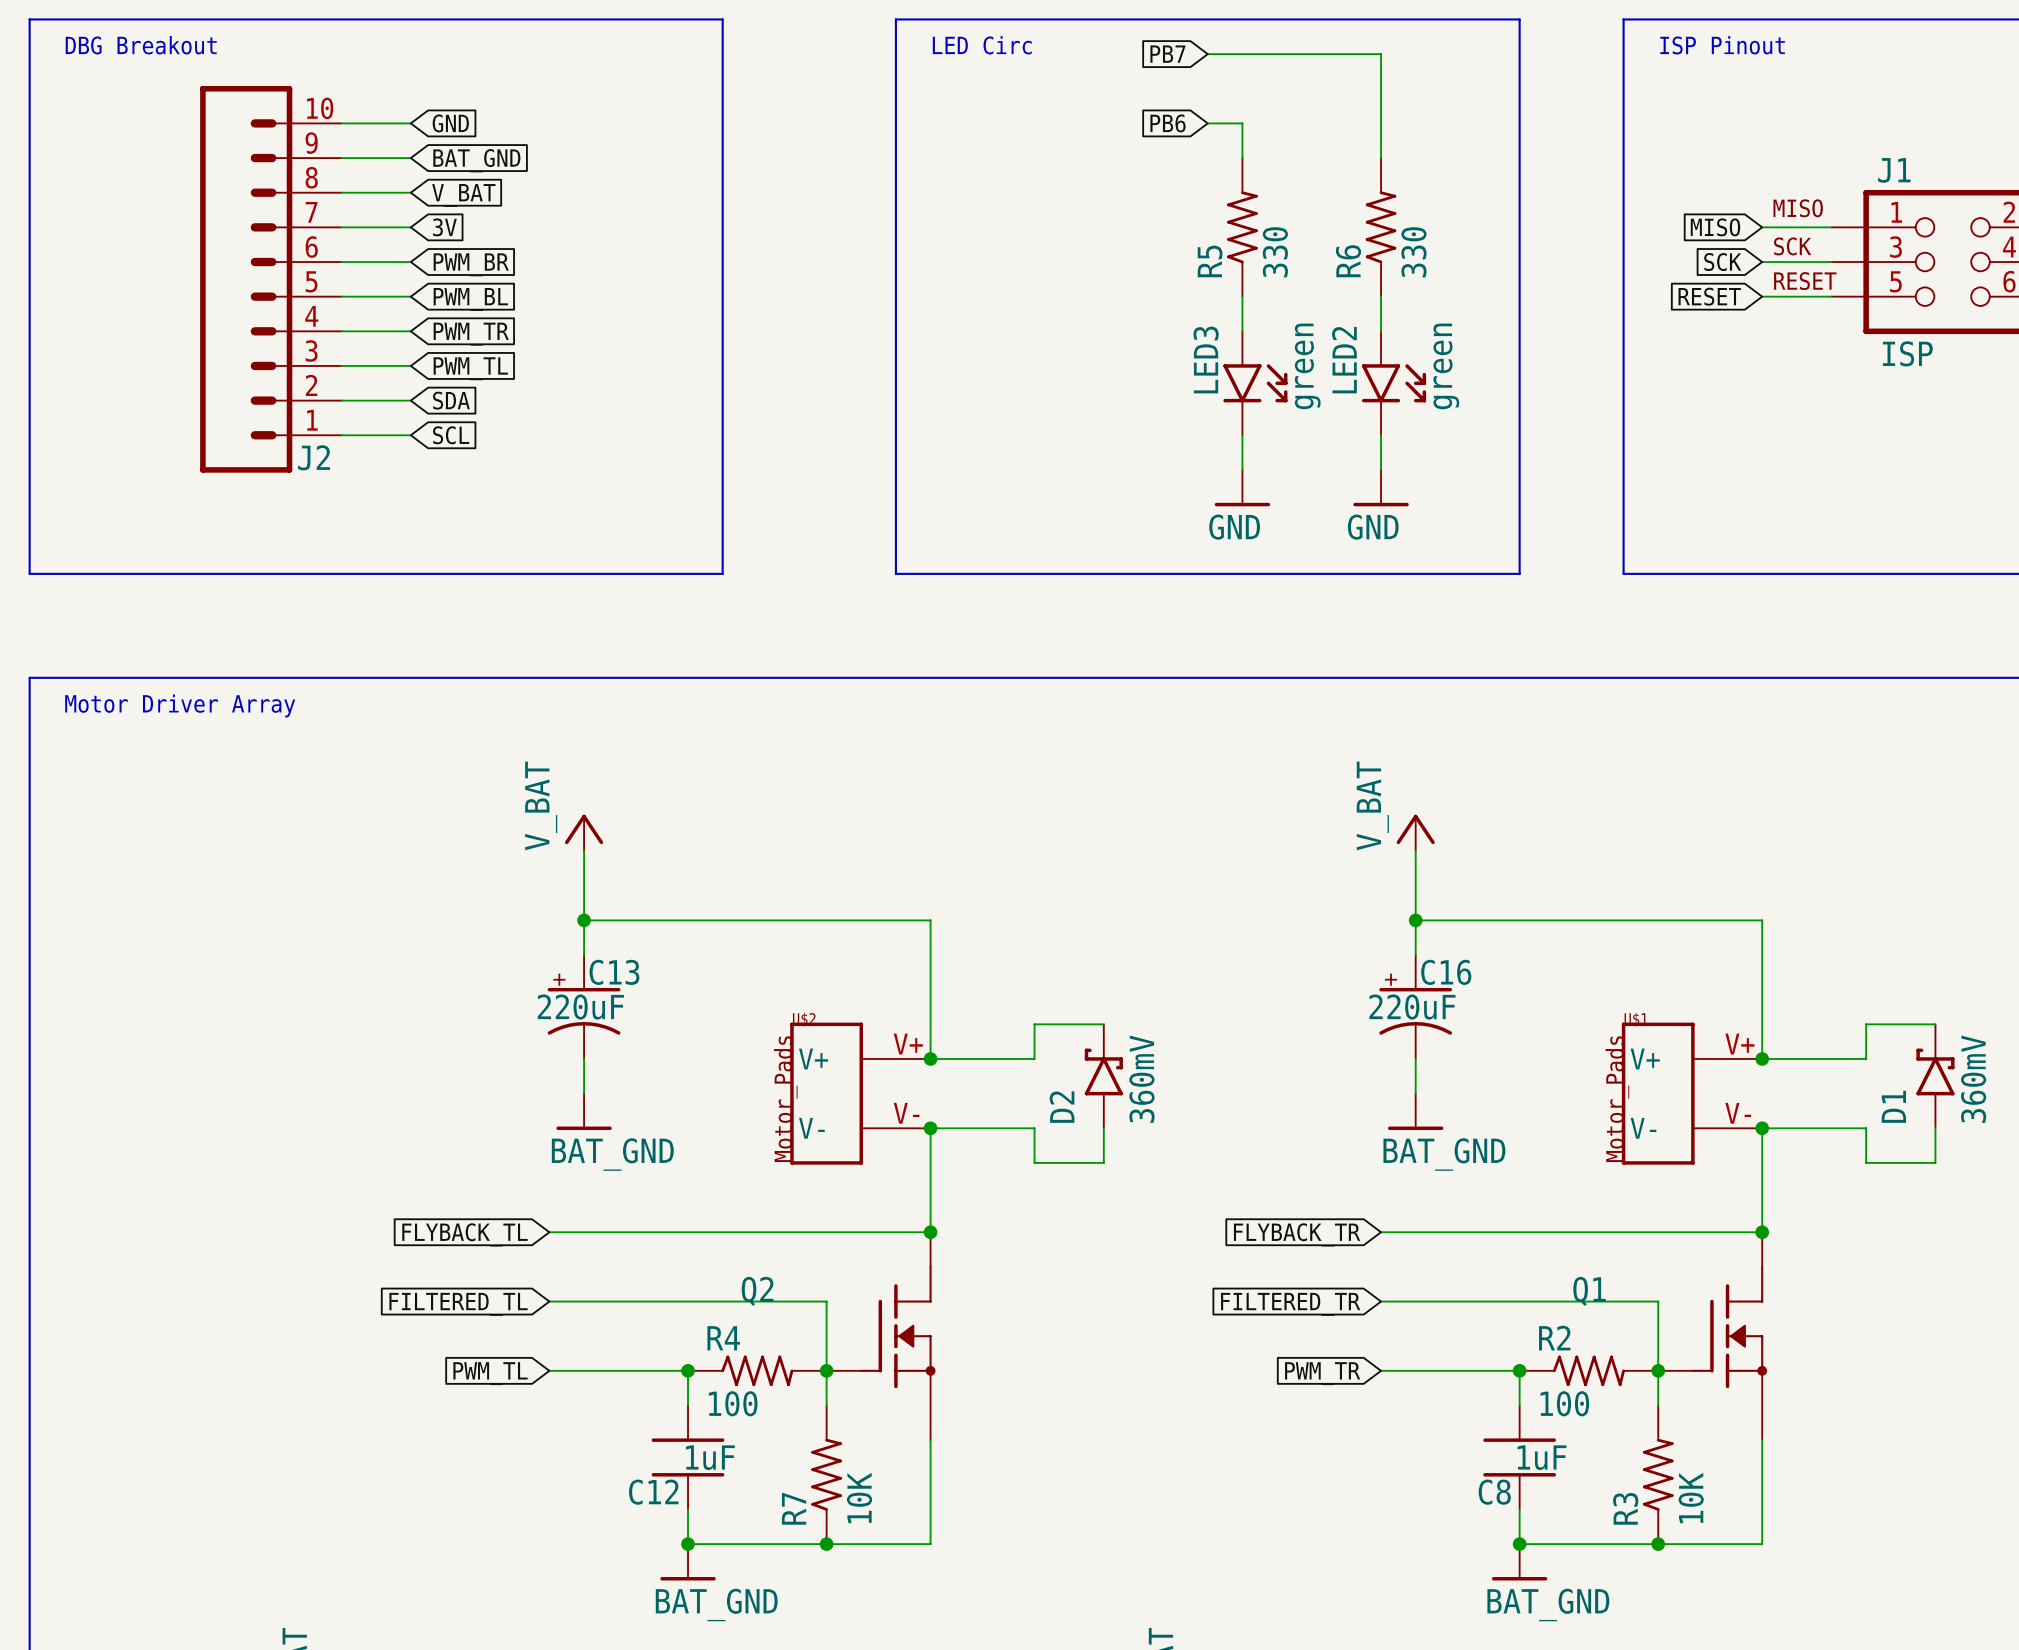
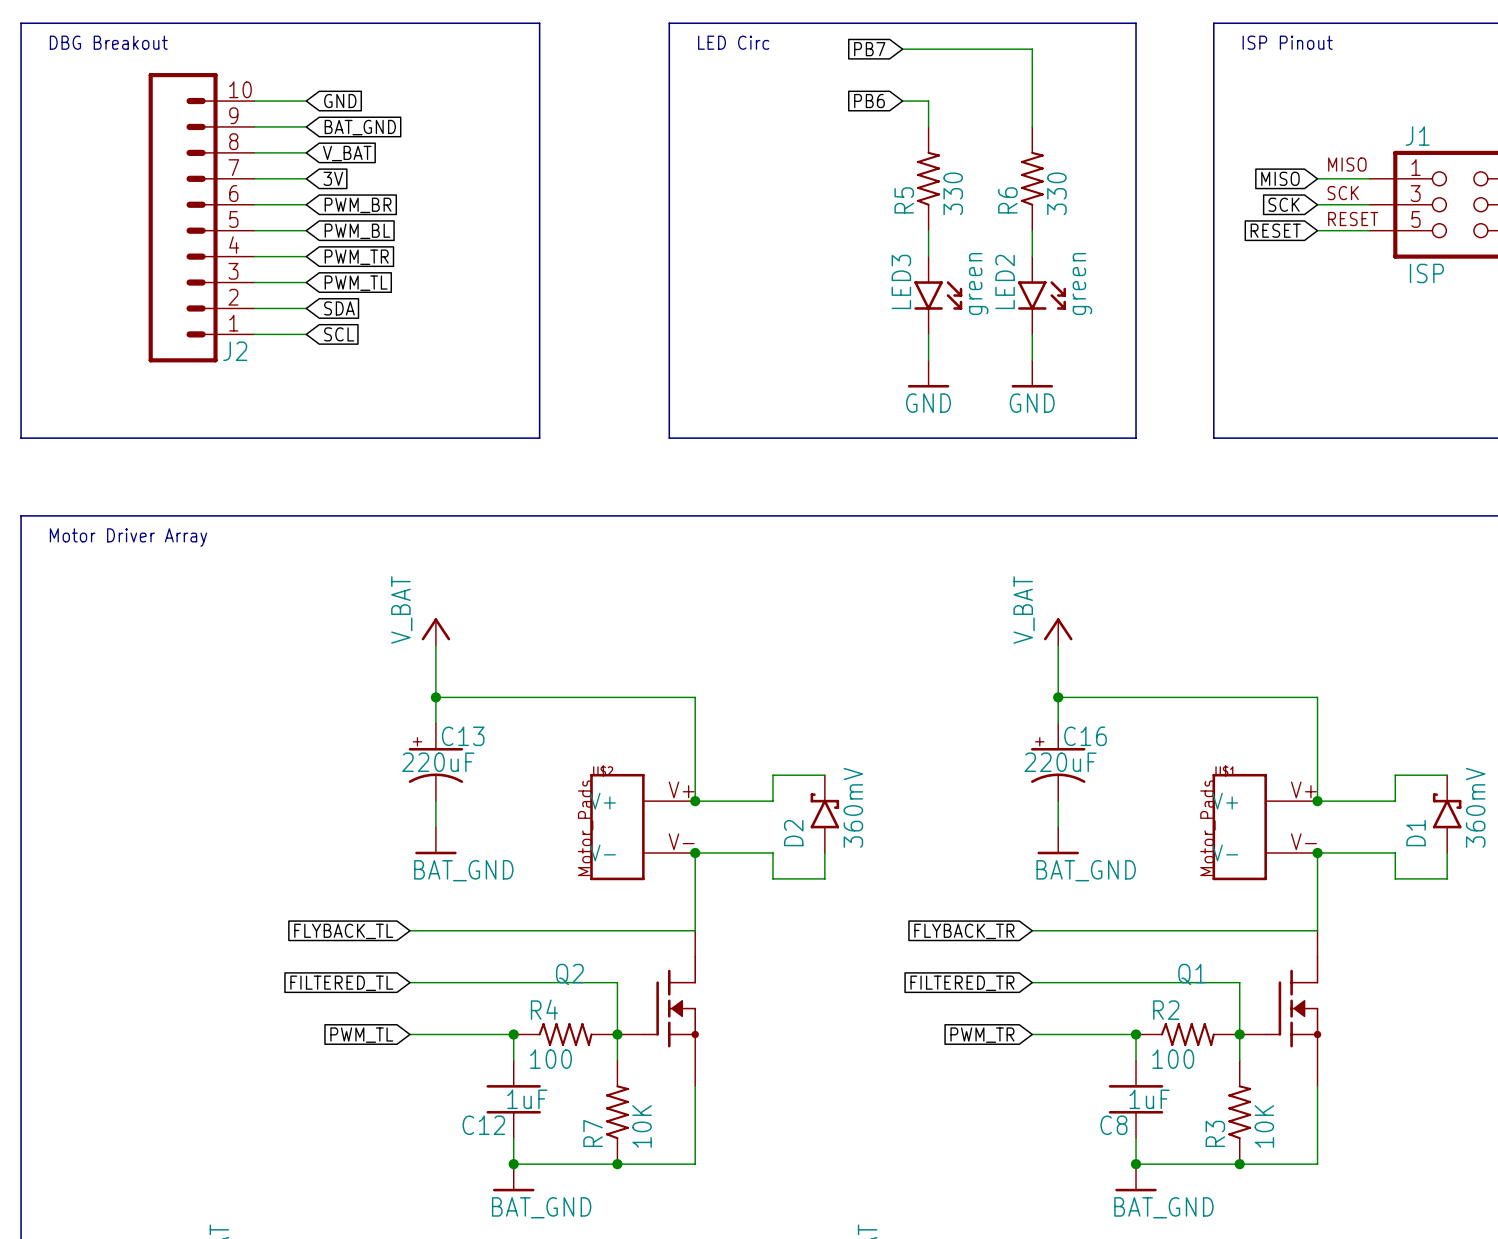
junction: (930, 1232) -> none
junction: (1762, 1232) -> none

